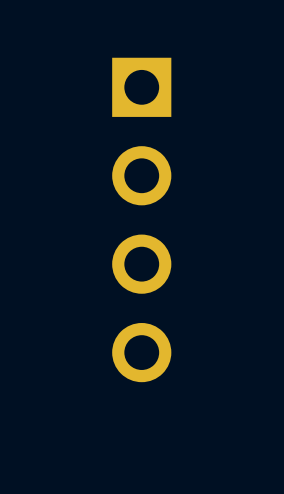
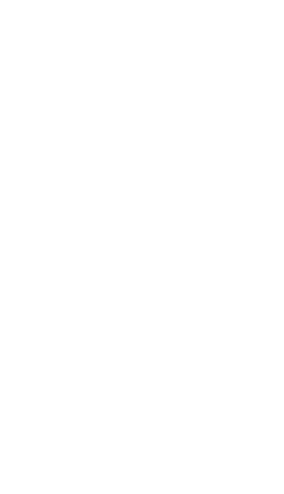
part: (141, 219) -> none

